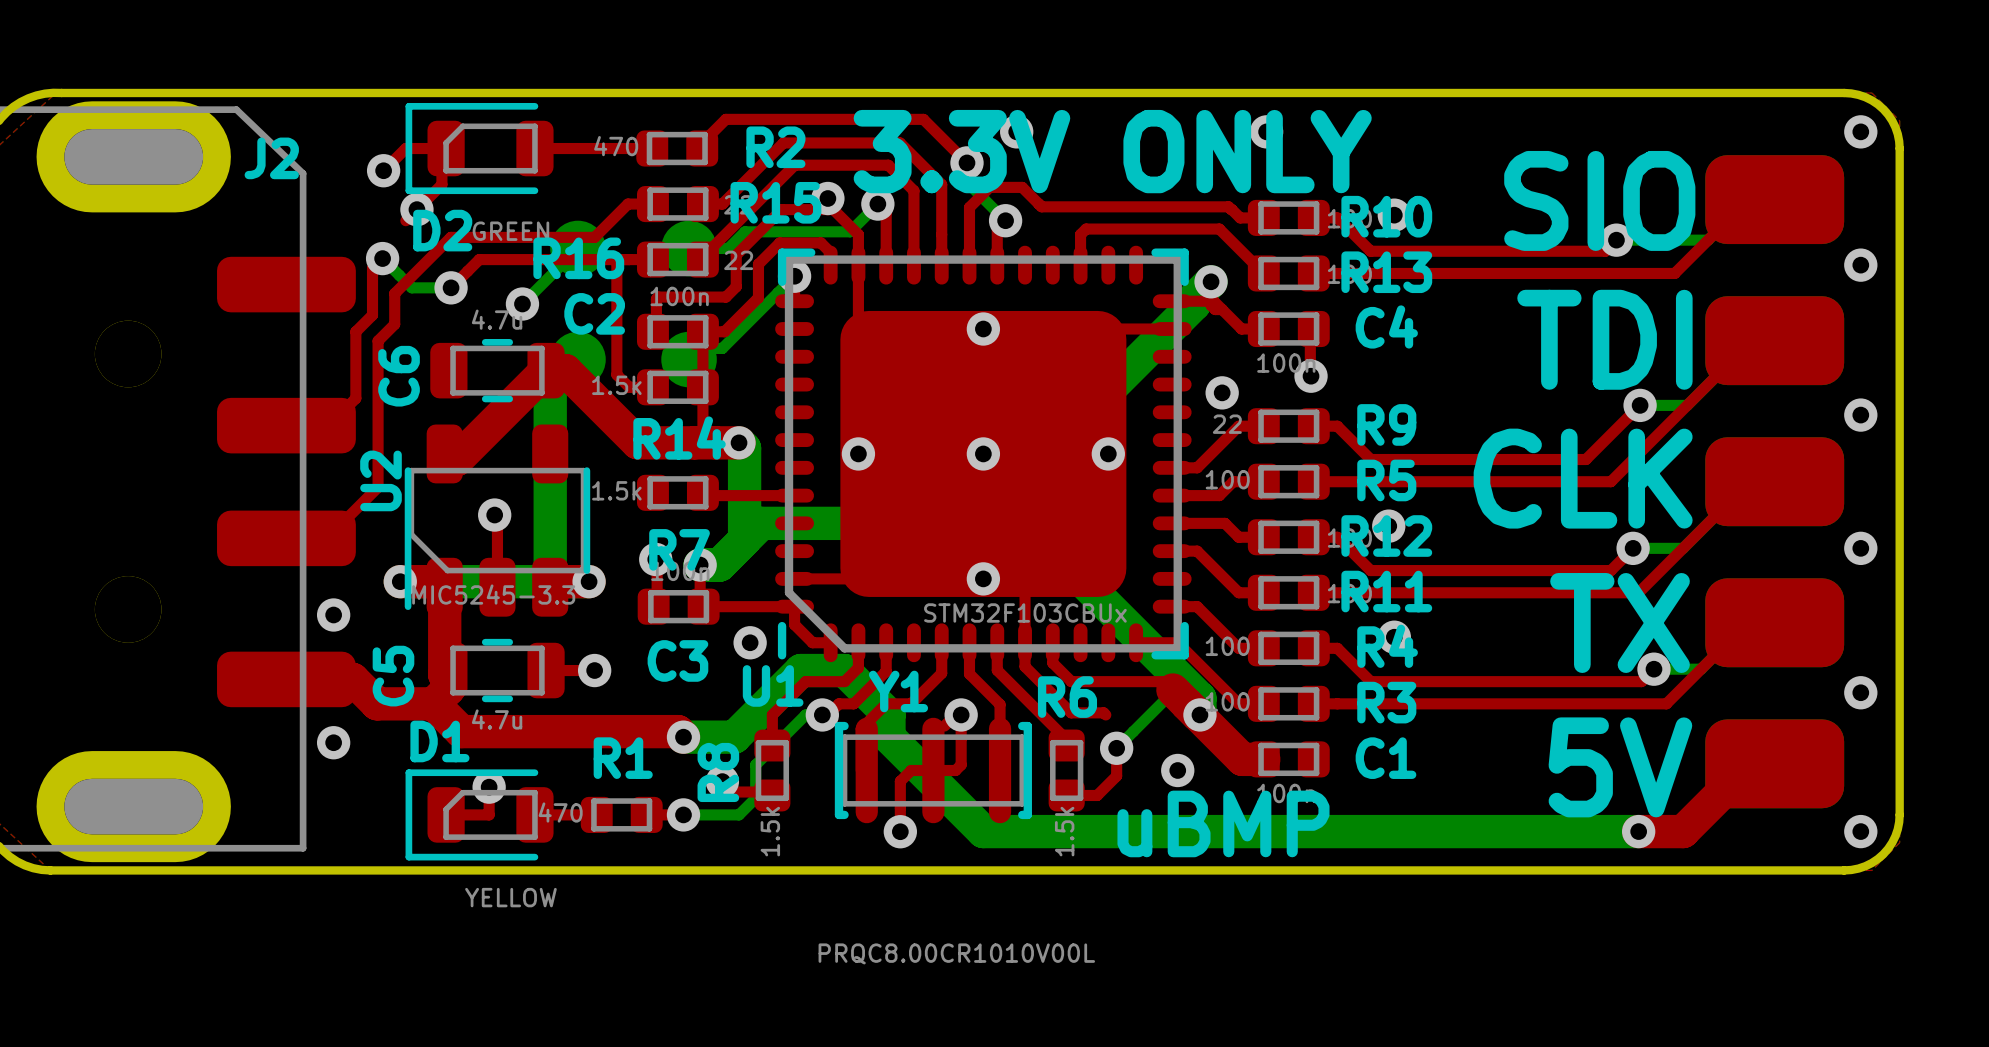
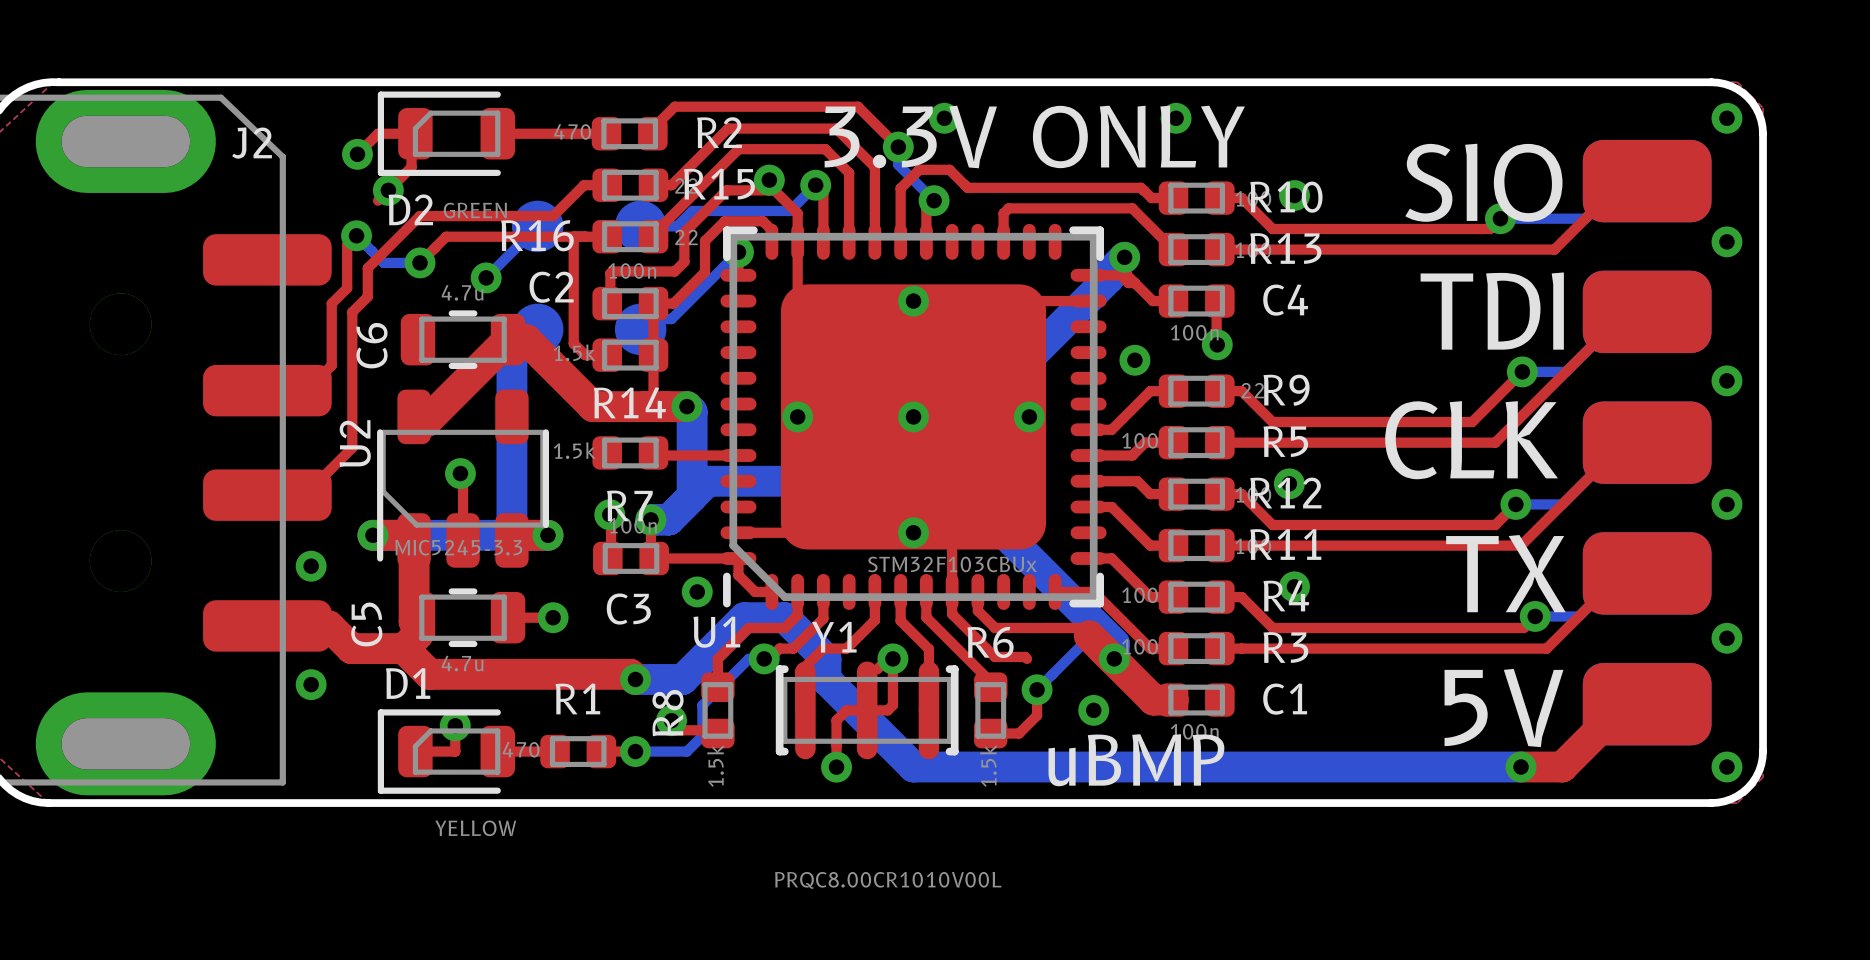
R9 value position: 22 (1227, 424) -> 22 (1252, 390)

